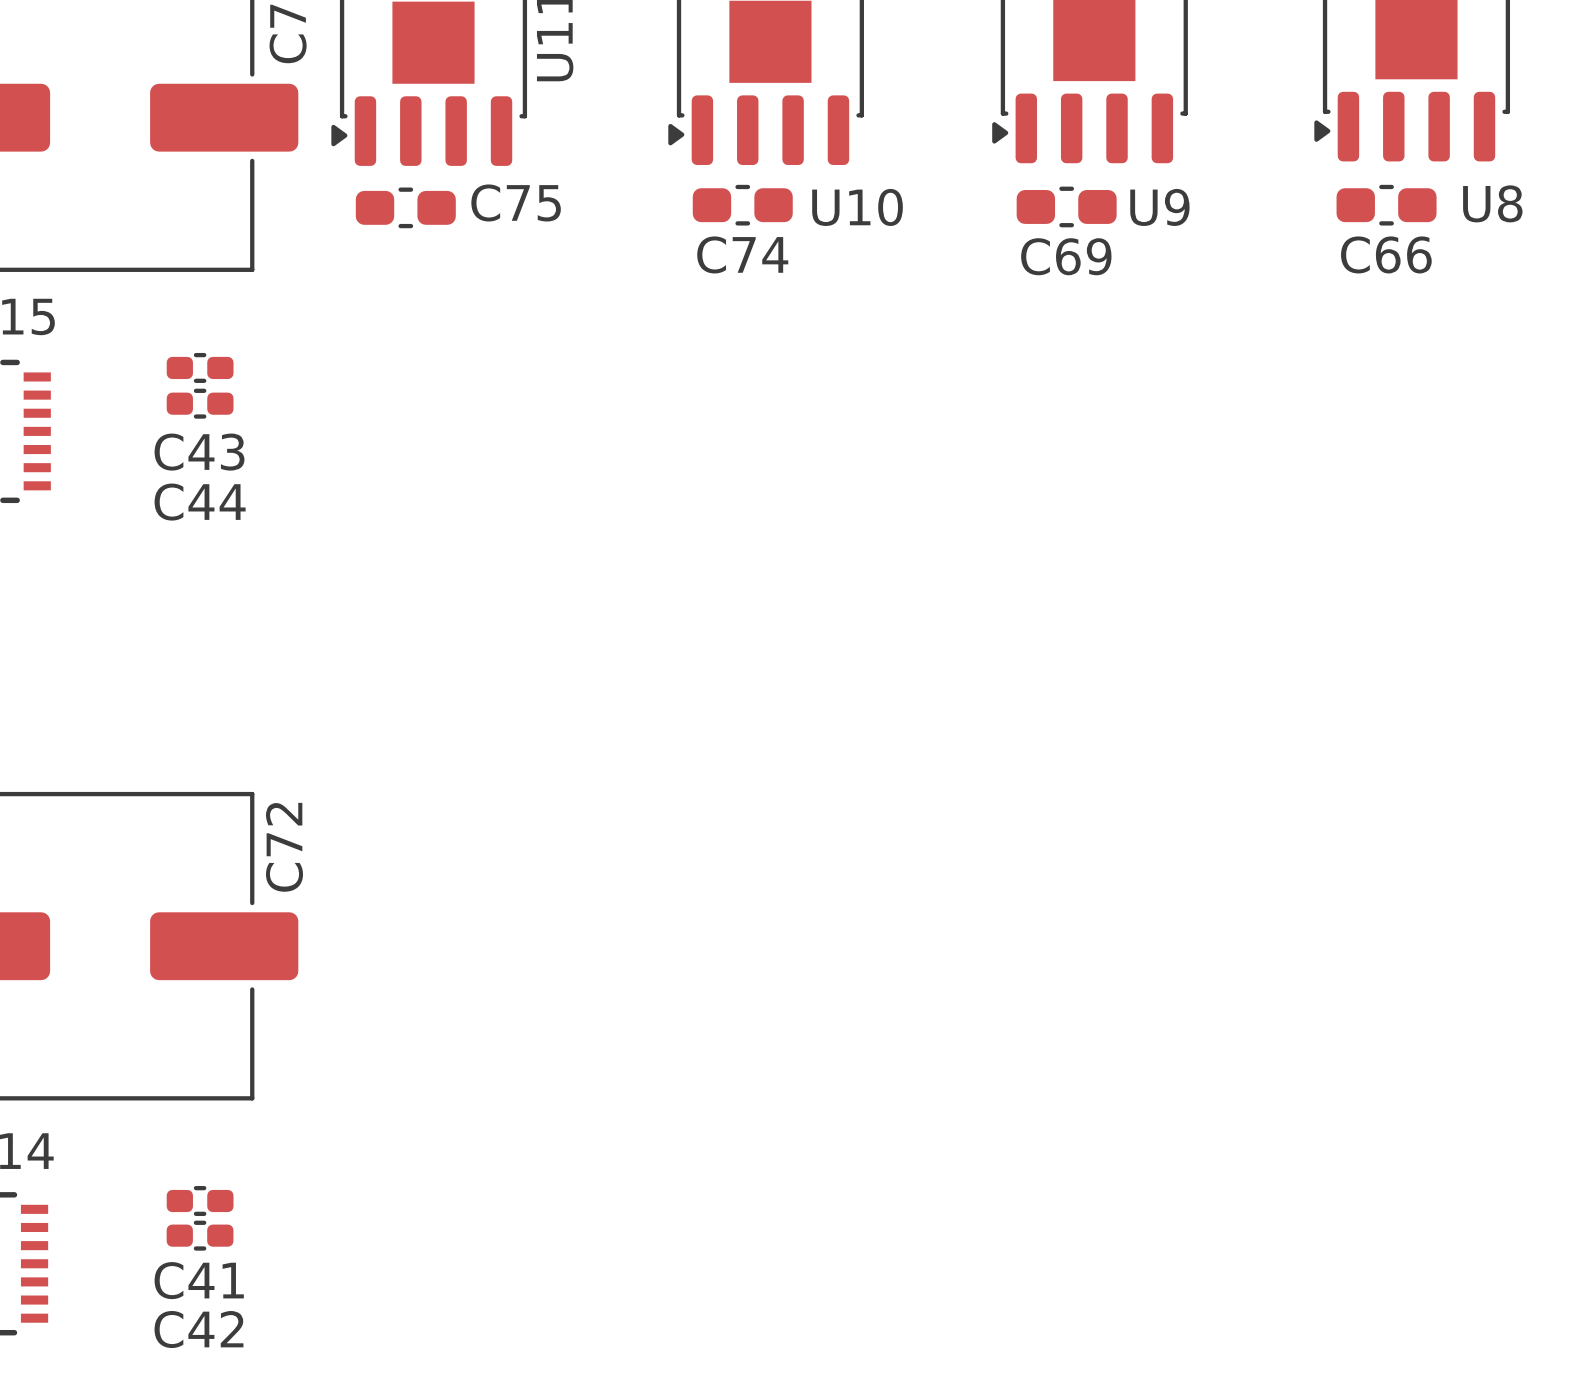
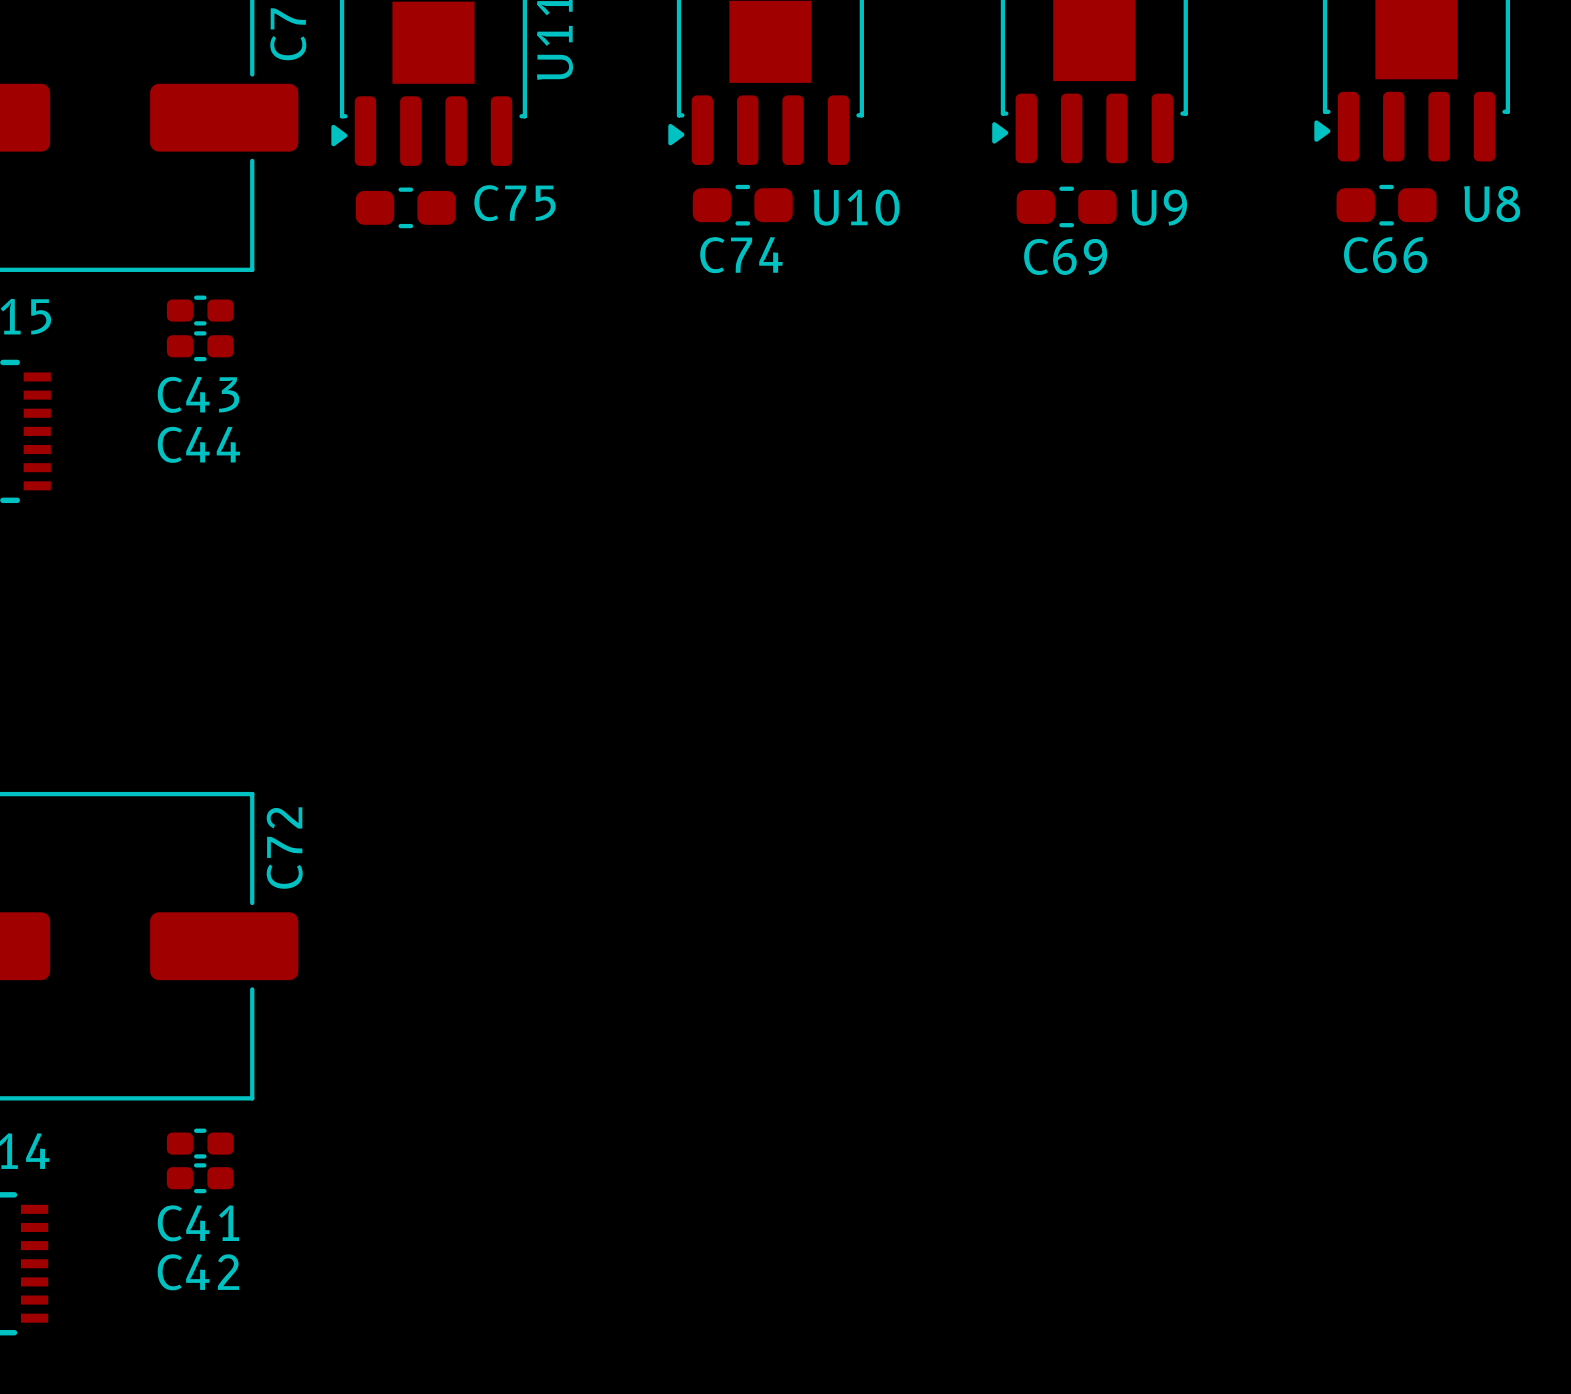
C43 position: (200, 367) -> (200, 310)
C44 position: (200, 403) -> (200, 346)
C41 position: (200, 1201) -> (200, 1143)
C42 position: (200, 1235) -> (200, 1178)

